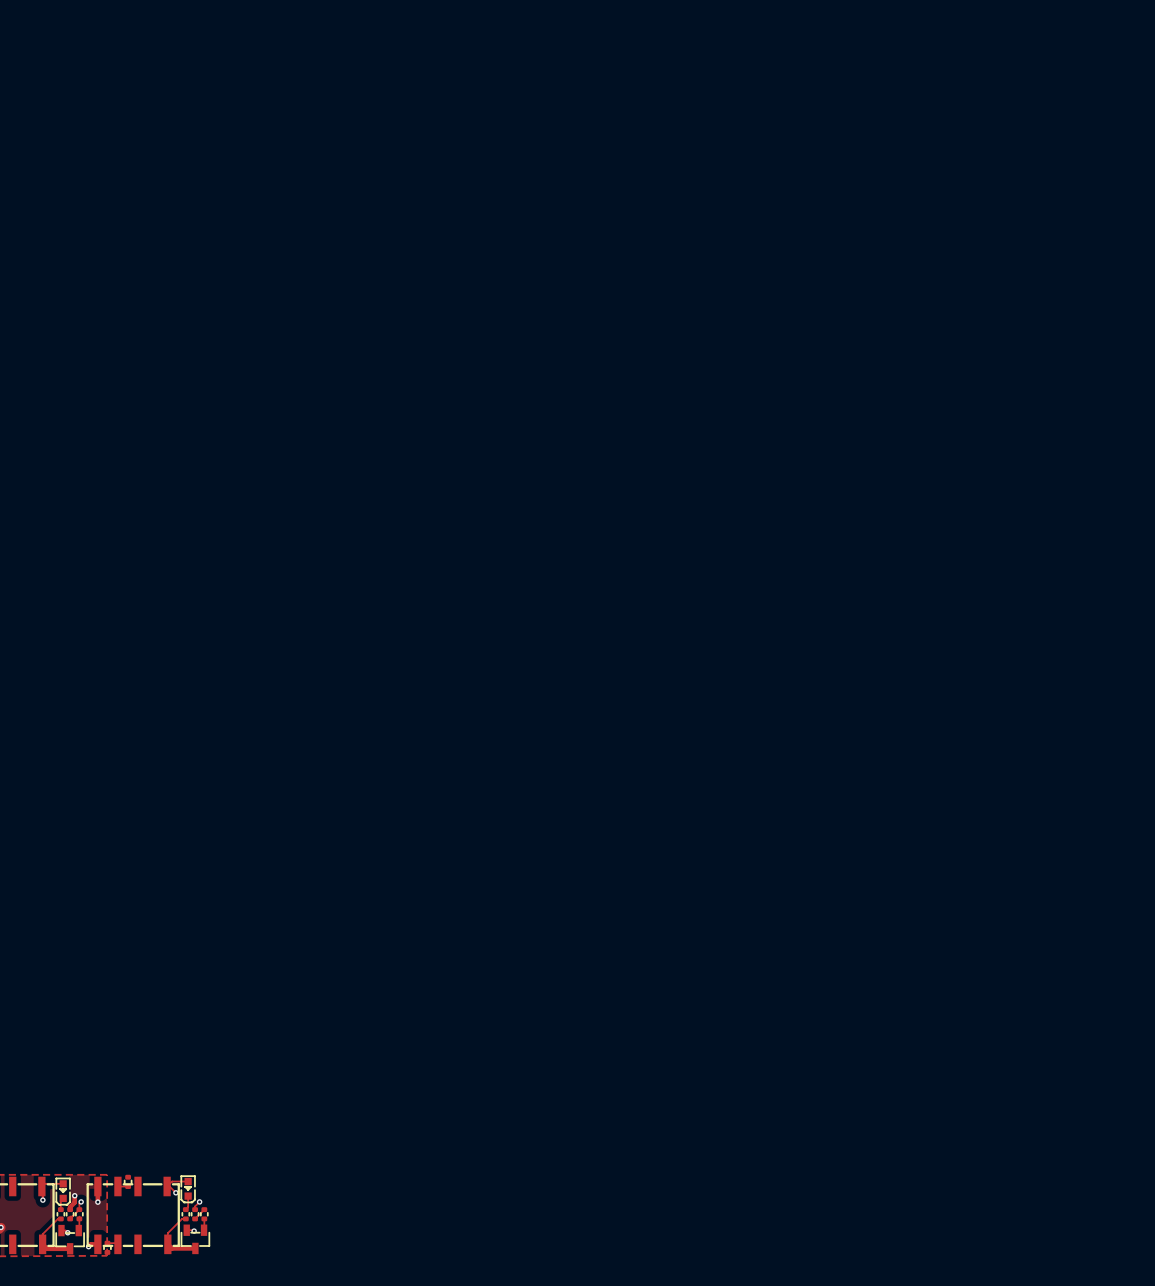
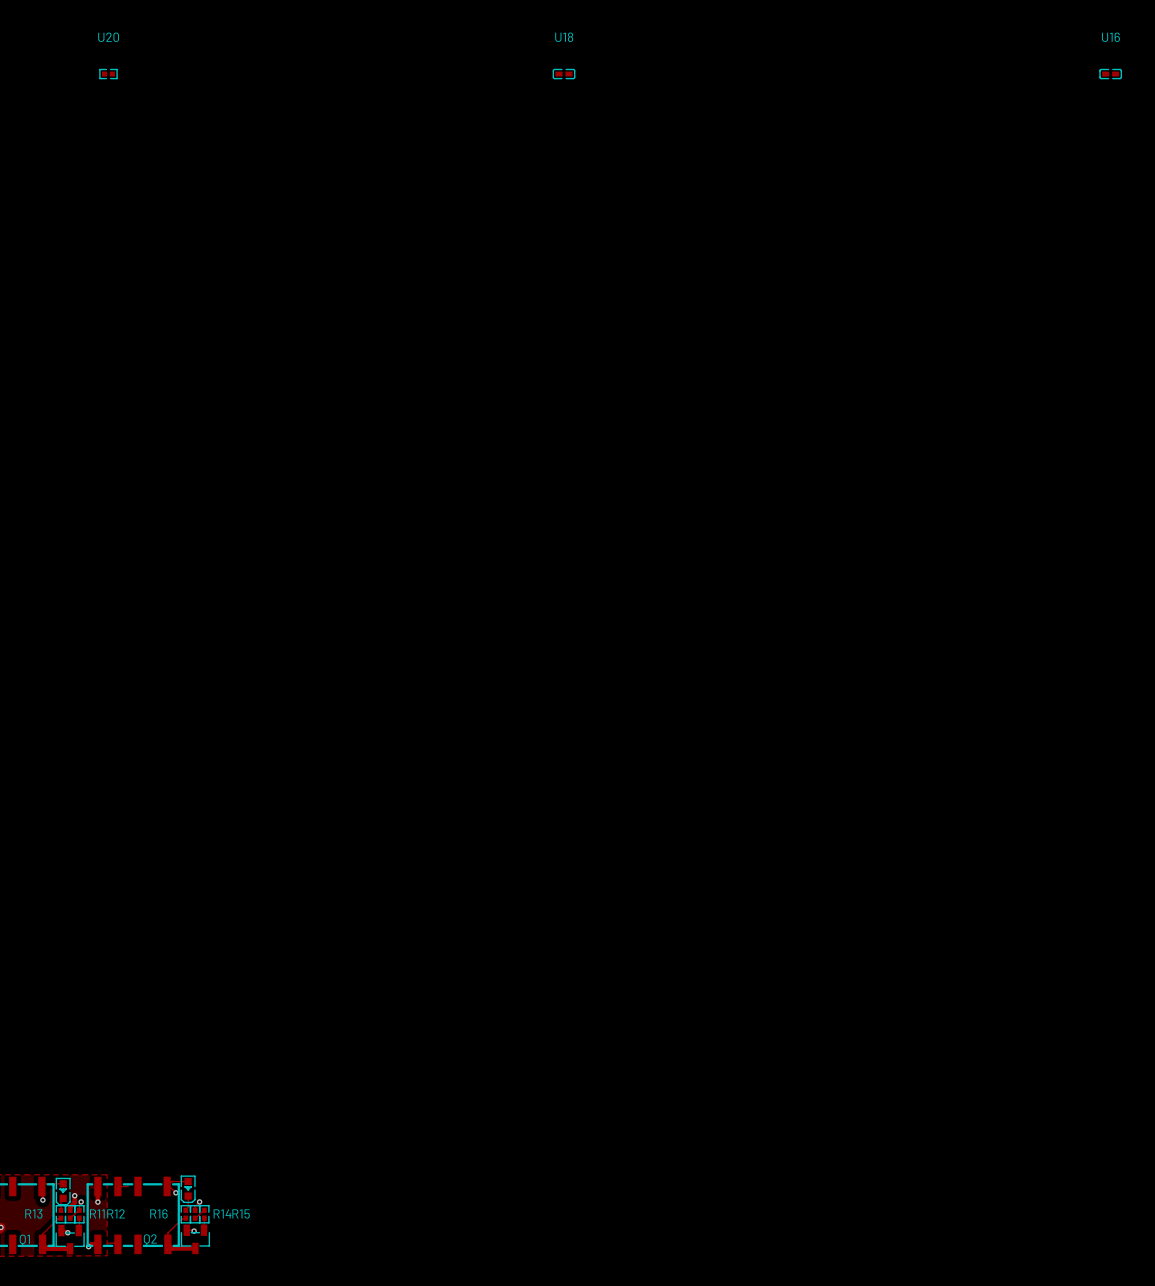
U20: none -> (108, 74)
U18: none -> (564, 74)
U16: none -> (1110, 74)
part: (128, 1181) -> none
part: (60, 1214) -> none
R11: none -> (60, 1214)
part: (70, 1214) -> none
R13: none -> (70, 1214)
part: (79, 1214) -> none
R12: none -> (79, 1214)
part: (185, 1214) -> none
R14: none -> (185, 1214)
part: (195, 1214) -> none
R16: none -> (195, 1214)
part: (204, 1214) -> none
R15: none -> (204, 1214)
Q1 name: none -> Q1 (24, 1240)
Q2 name: none -> Q2 (150, 1239)
part: (107, 1247) -> none

